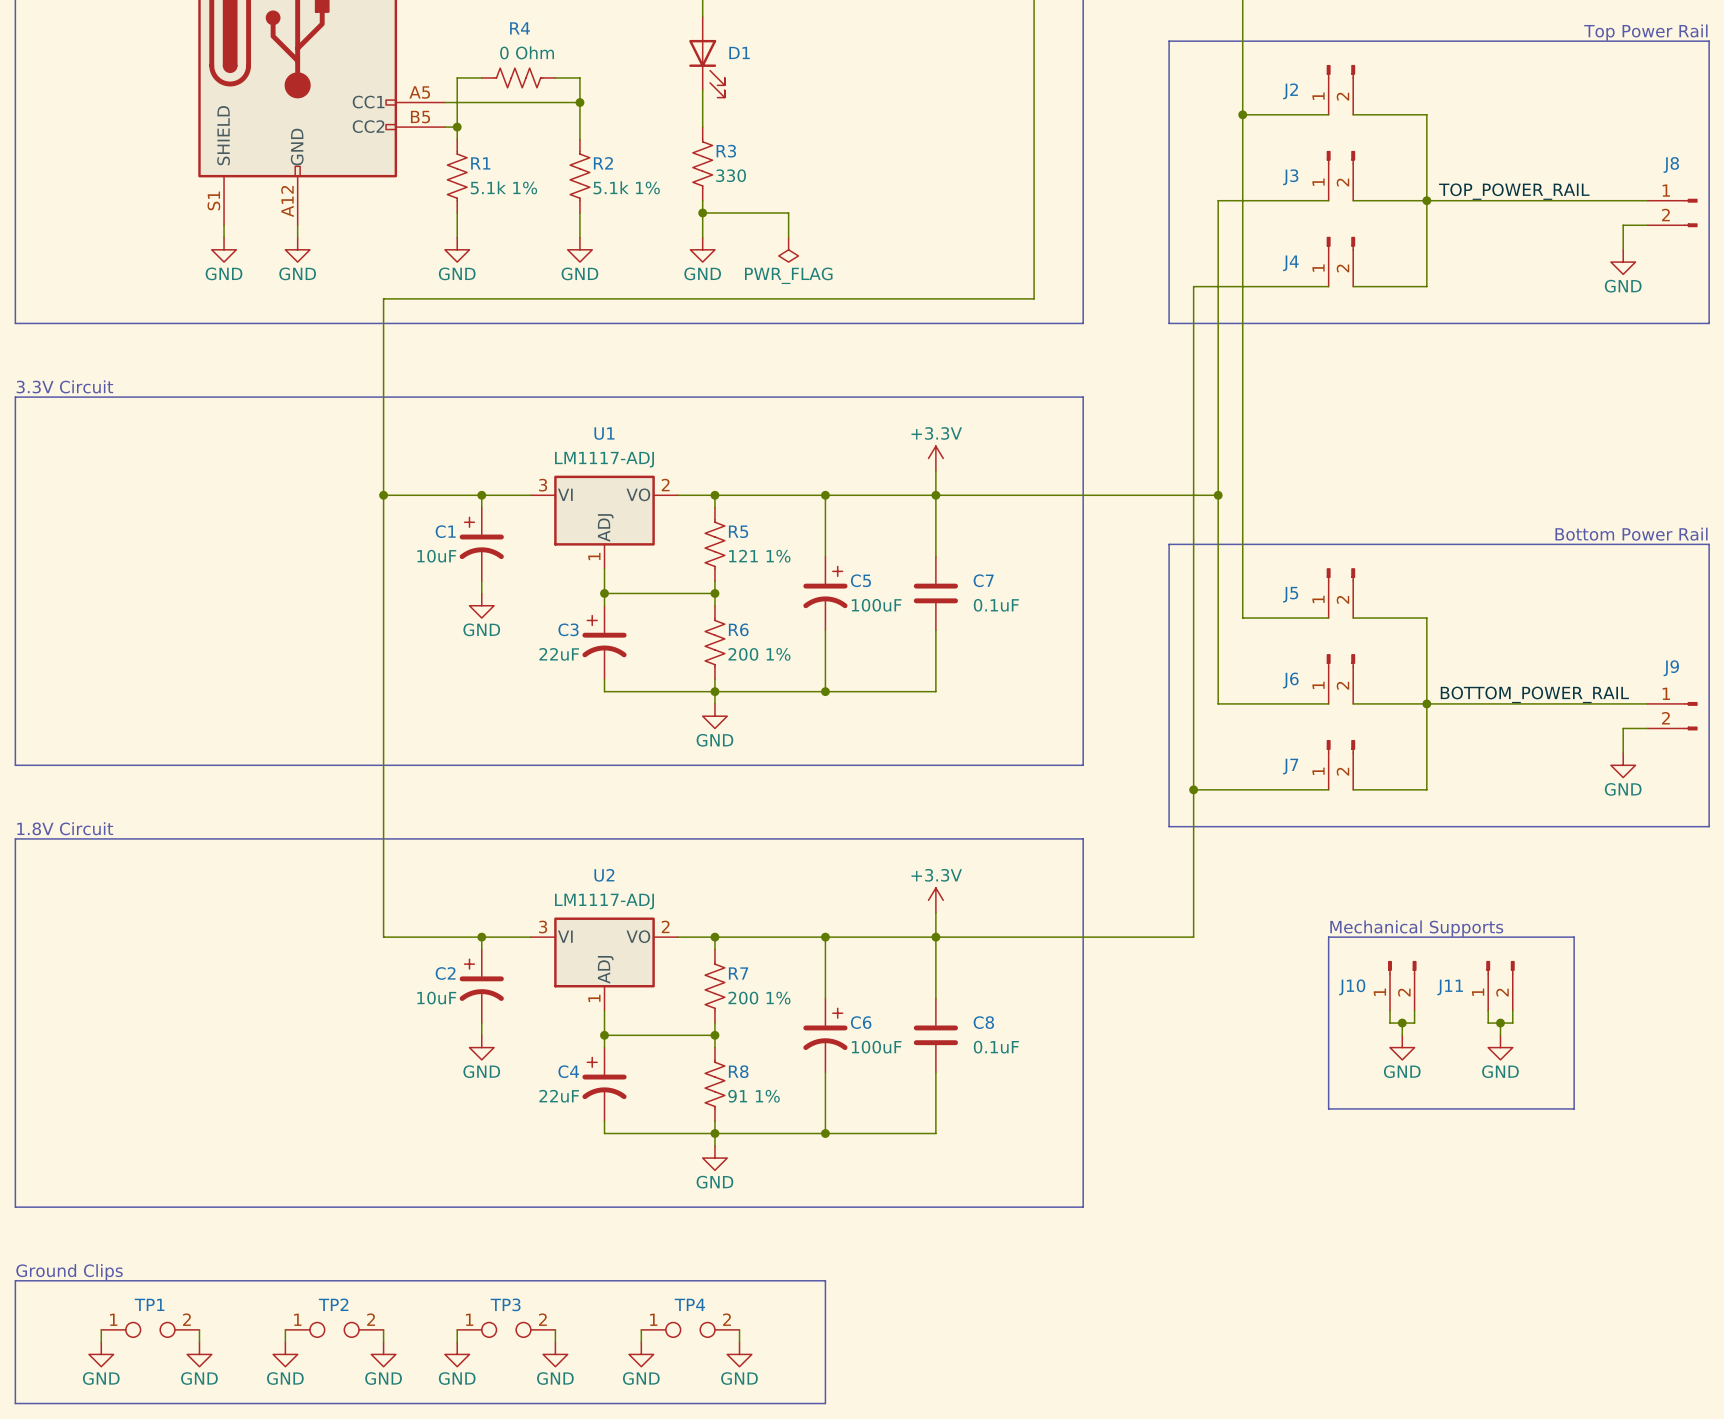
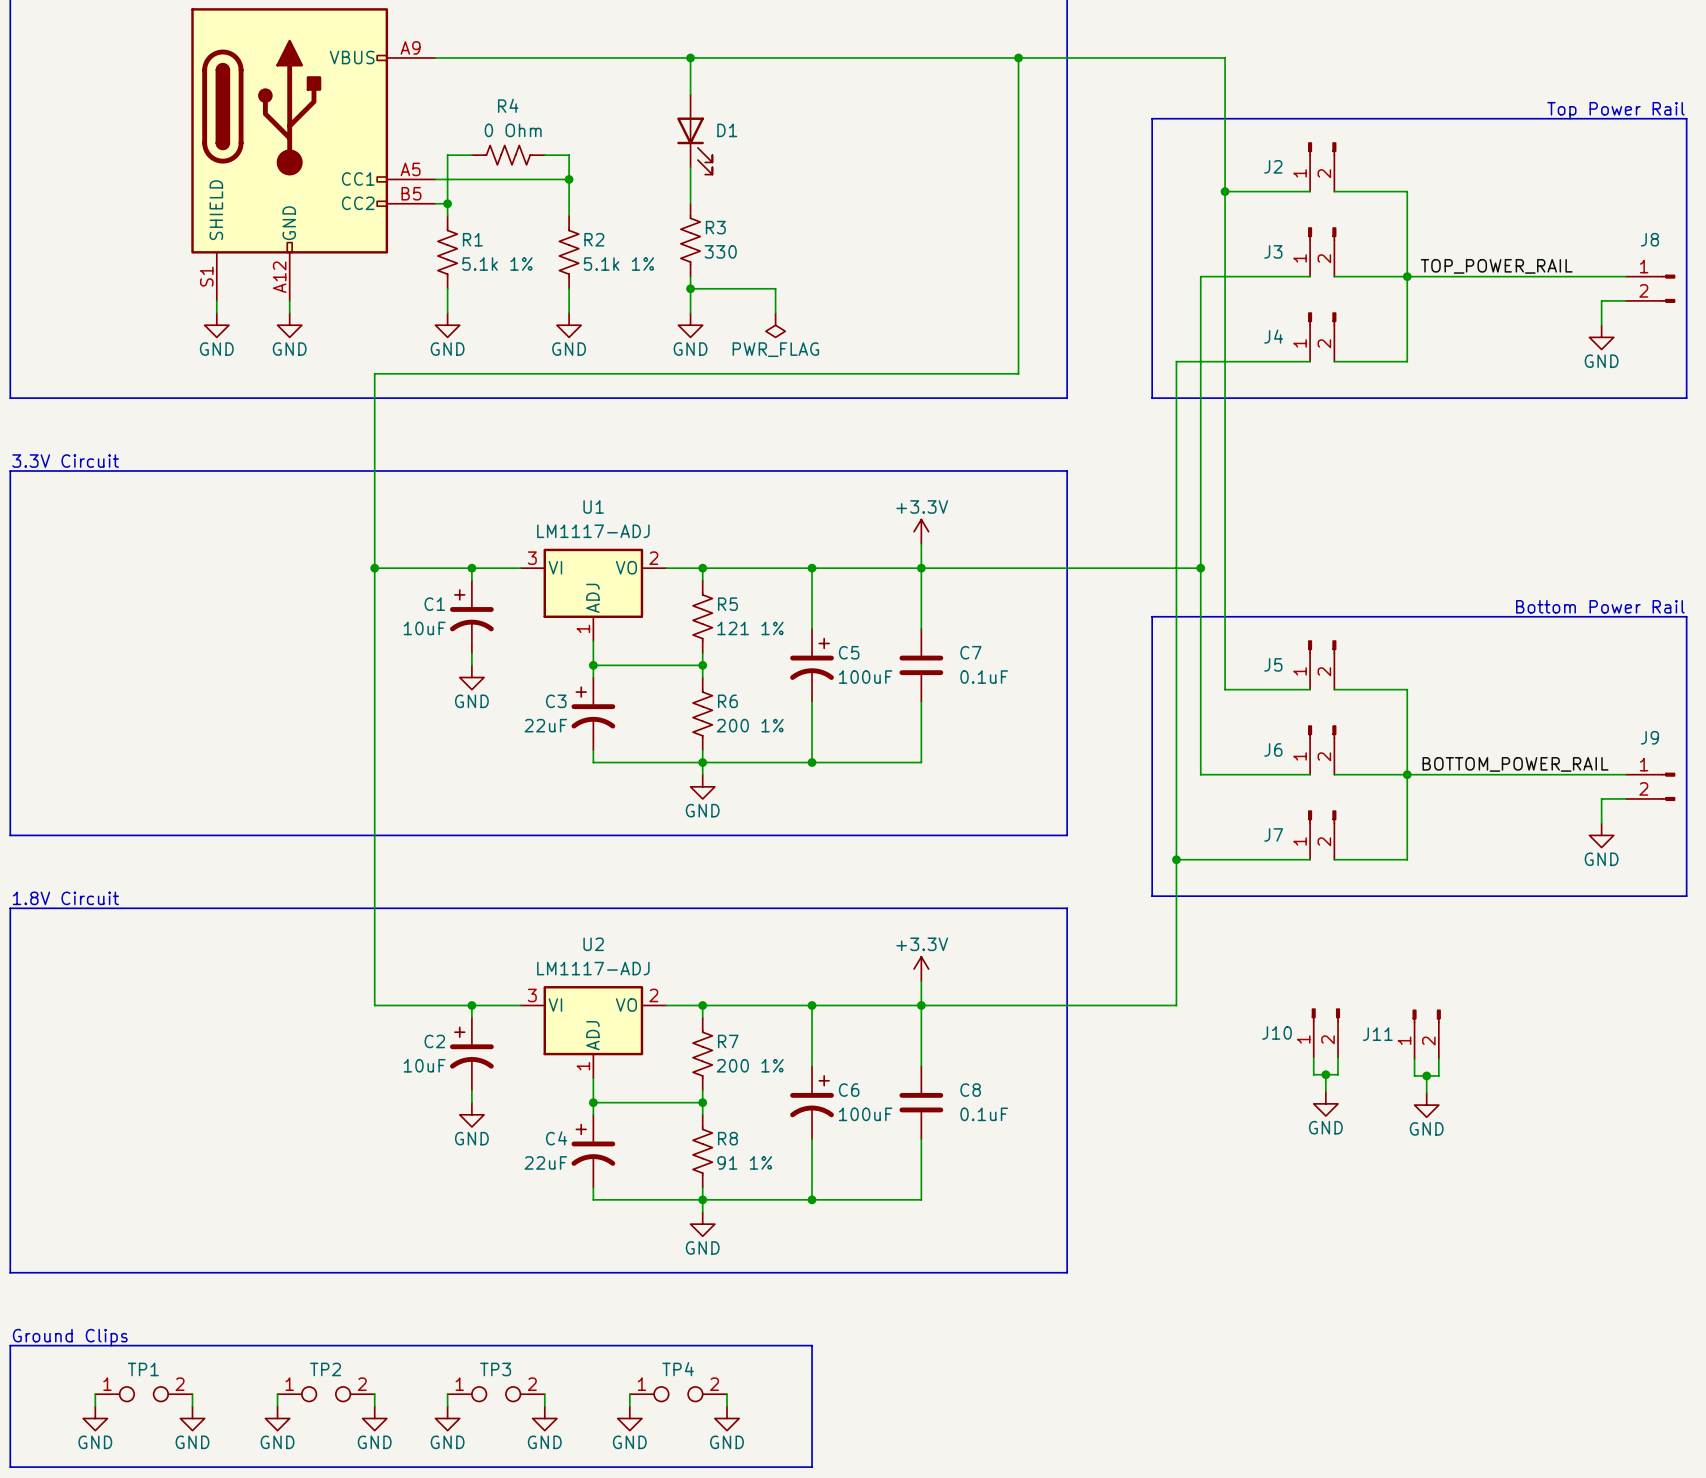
text: Mechanical Supports (1416, 928) -> none
line: (1328, 937) (1574, 937) (1574, 1108) (1328, 1108) (1328, 937) -> none
J10 position: (1402, 985) -> (1325, 1033)
J11 position: (1500, 985) -> (1426, 1034)
wire: none -> (1313, 1057) (1313, 1074) (1338, 1074) (1338, 1057)
wire: none -> (1414, 1058) (1414, 1075) (1438, 1075) (1438, 1058)
wire: none -> (1325, 1074) (1325, 1091)
junction: none -> (1325, 1074)
wire: none -> (1426, 1075) (1426, 1092)
junction: none -> (1426, 1075)
wire: (1390, 1010) (1390, 1023) (1414, 1023) (1414, 1010) -> none
wire: (1488, 1010) (1488, 1023) (1512, 1023) (1512, 1010) -> none
wire: (1402, 1023) (1402, 1035) -> none
junction: (1402, 1023) -> none
wire: (1500, 1023) (1500, 1035) -> none
junction: (1500, 1023) -> none
power symbol: none -> GND (1325, 1103)
power symbol: none -> GND (1426, 1105)
power symbol: GND (1402, 1047) -> none
power symbol: GND (1500, 1047) -> none

